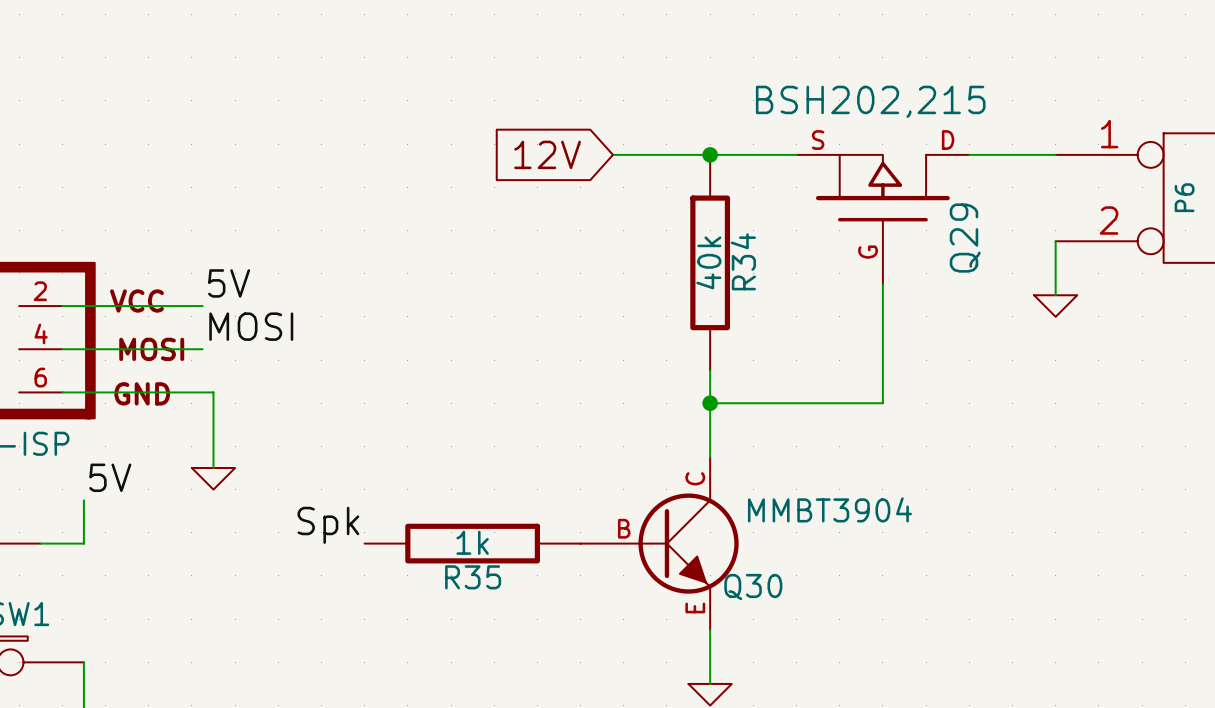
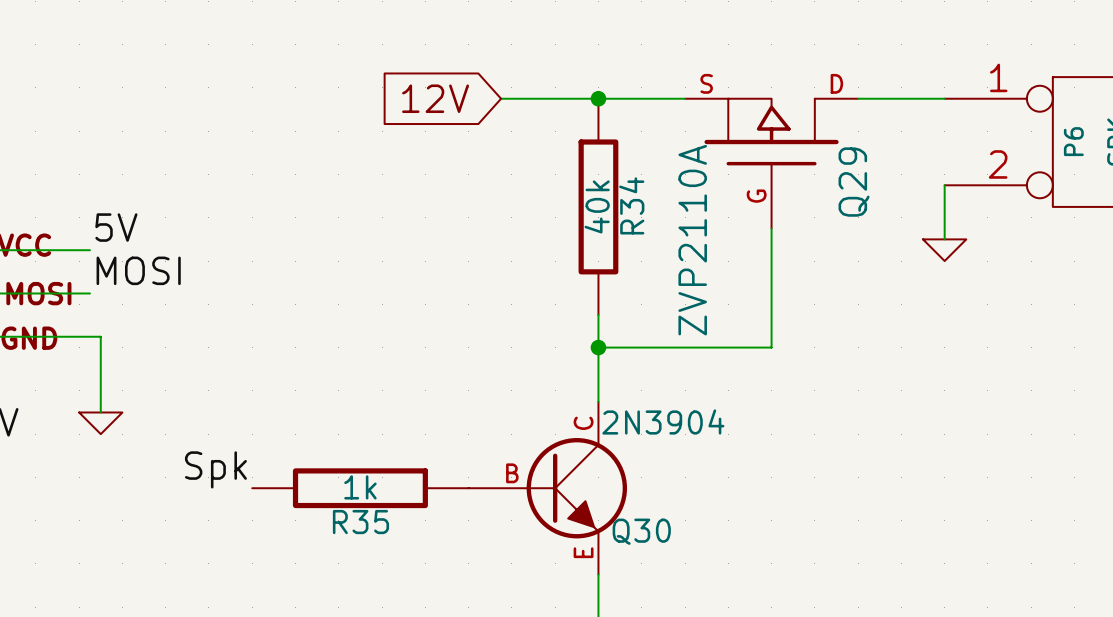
Q29 value: BSH202,215 (870, 101) -> ZVP2110A (692, 240)
Q30 value: MMBT3904 (829, 509) -> 2N3904 (663, 421)

